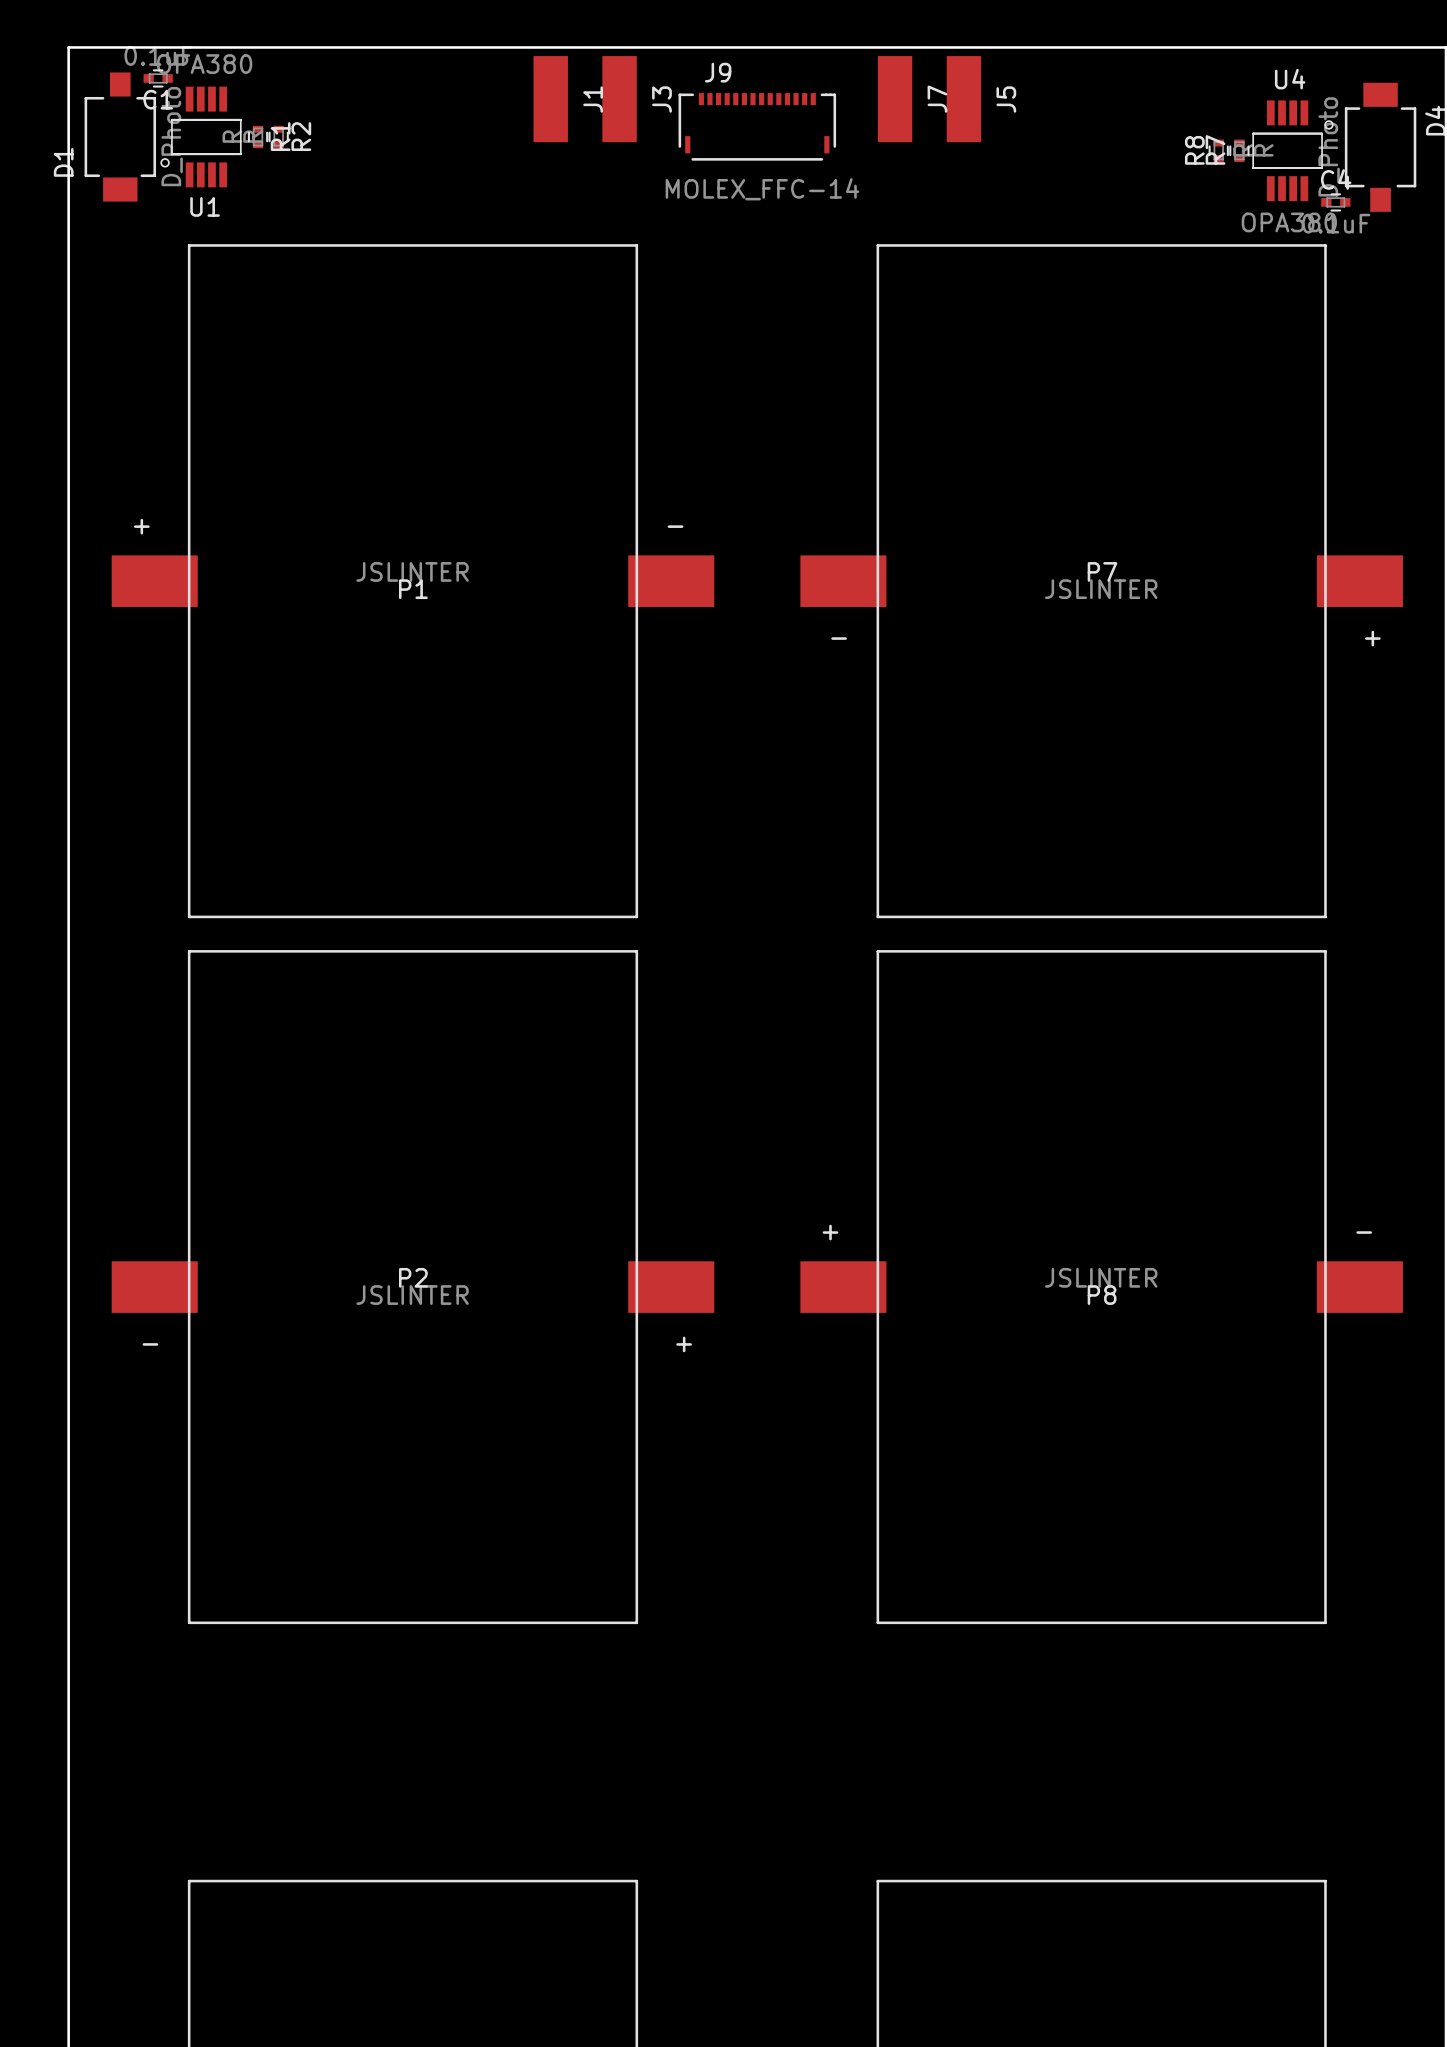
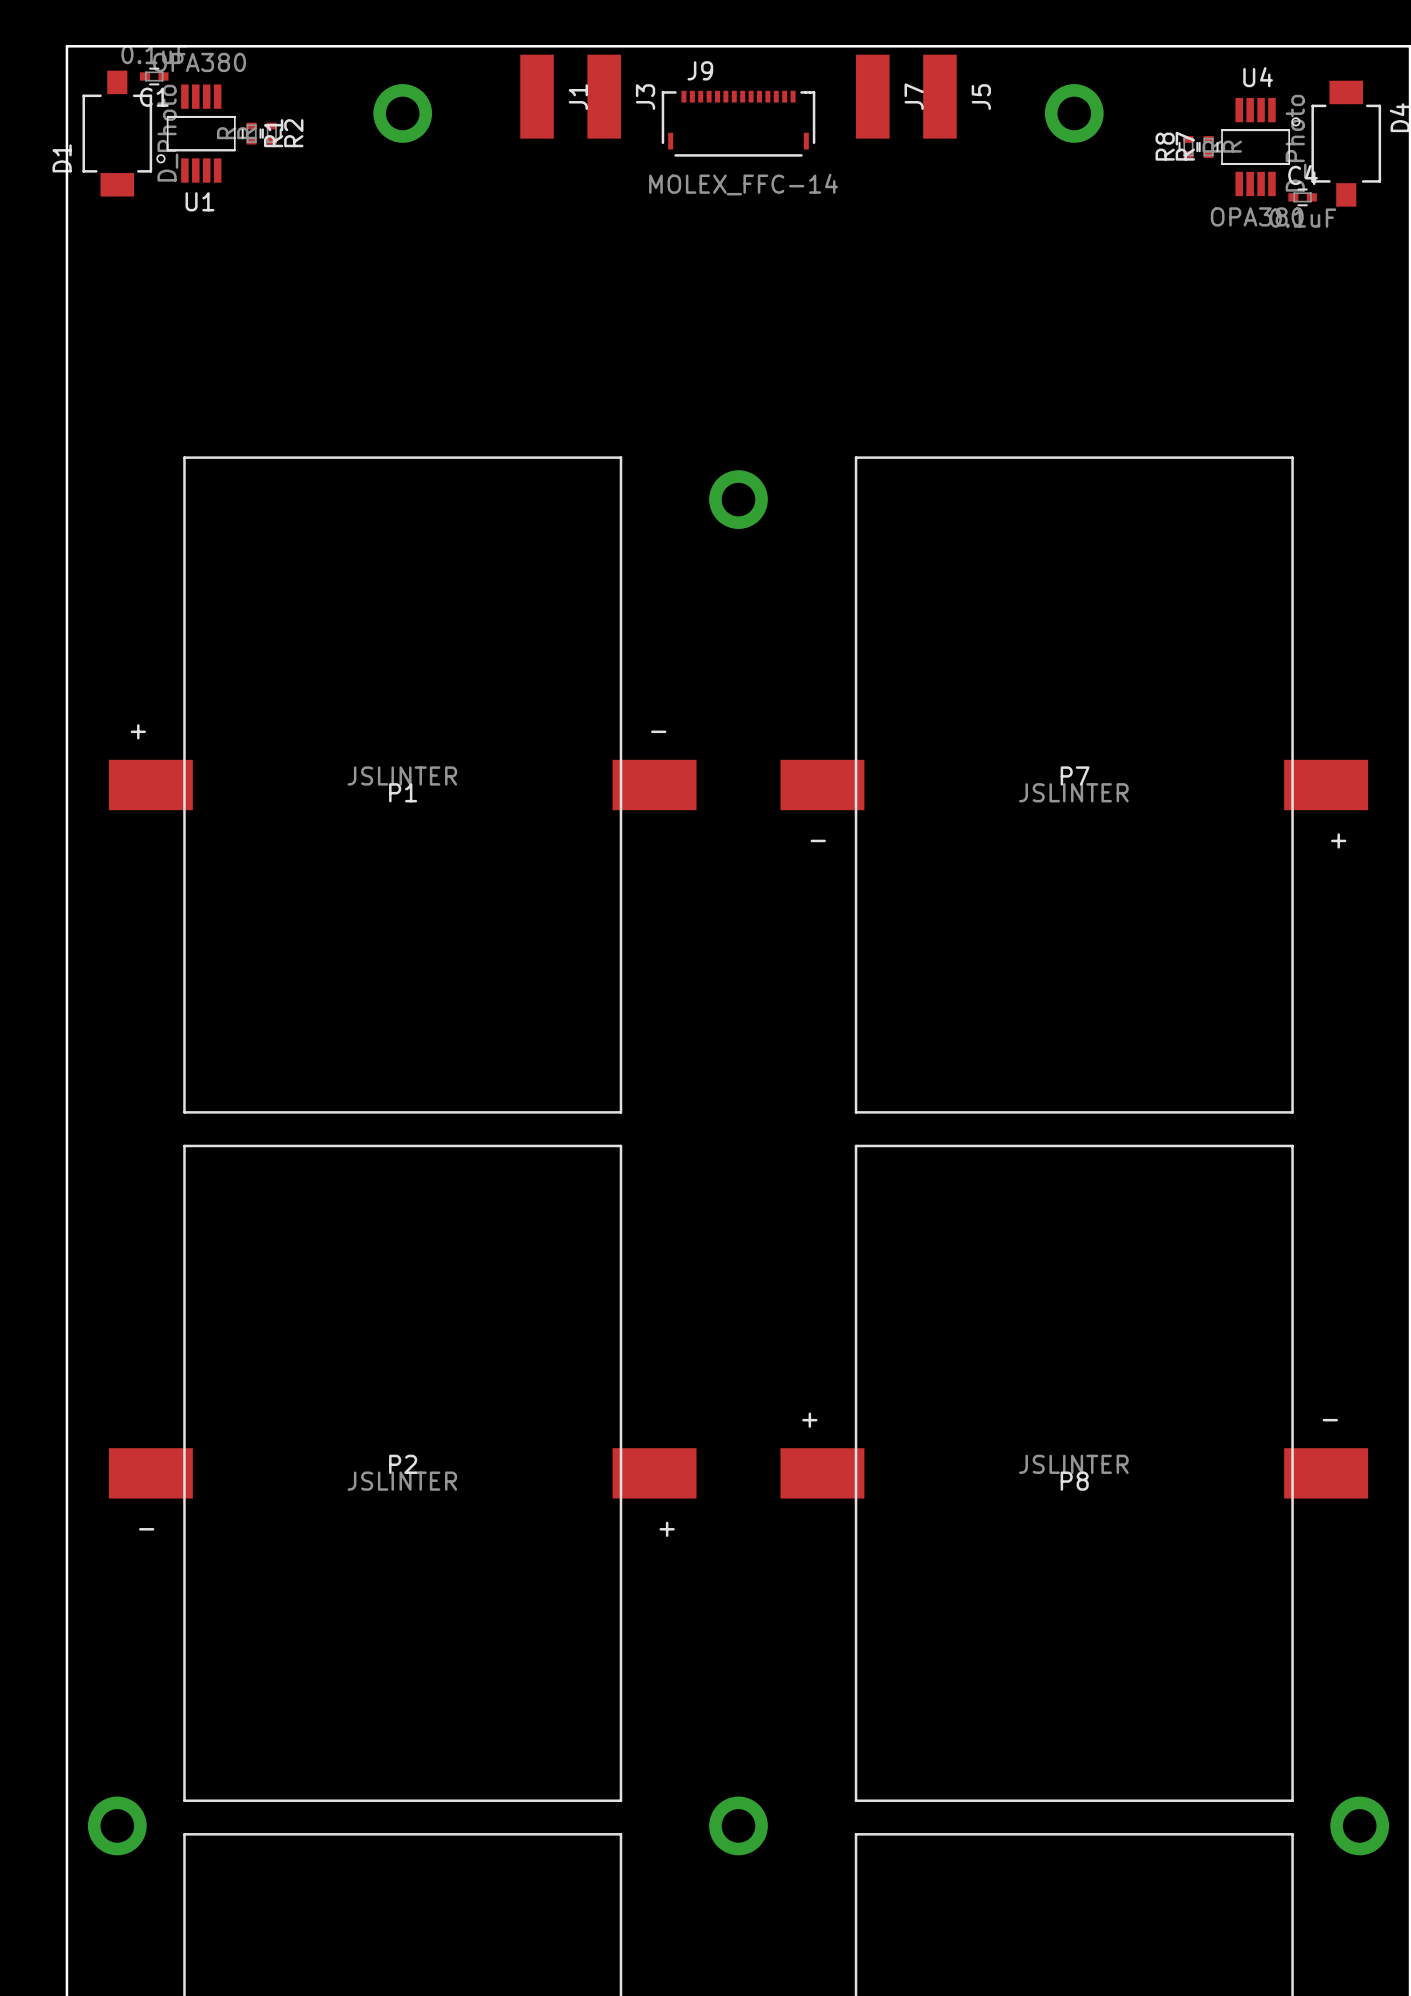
part: none -> (402, 113)
part: none -> (1074, 113)
part: none -> (738, 499)
P1 position: (412, 581) -> (402, 785)
P7 position: (1101, 581) -> (1074, 785)
P2 position: (412, 1287) -> (402, 1473)
P8 position: (1101, 1287) -> (1074, 1473)
part: none -> (117, 1825)
part: none -> (738, 1825)
part: none -> (1359, 1825)

